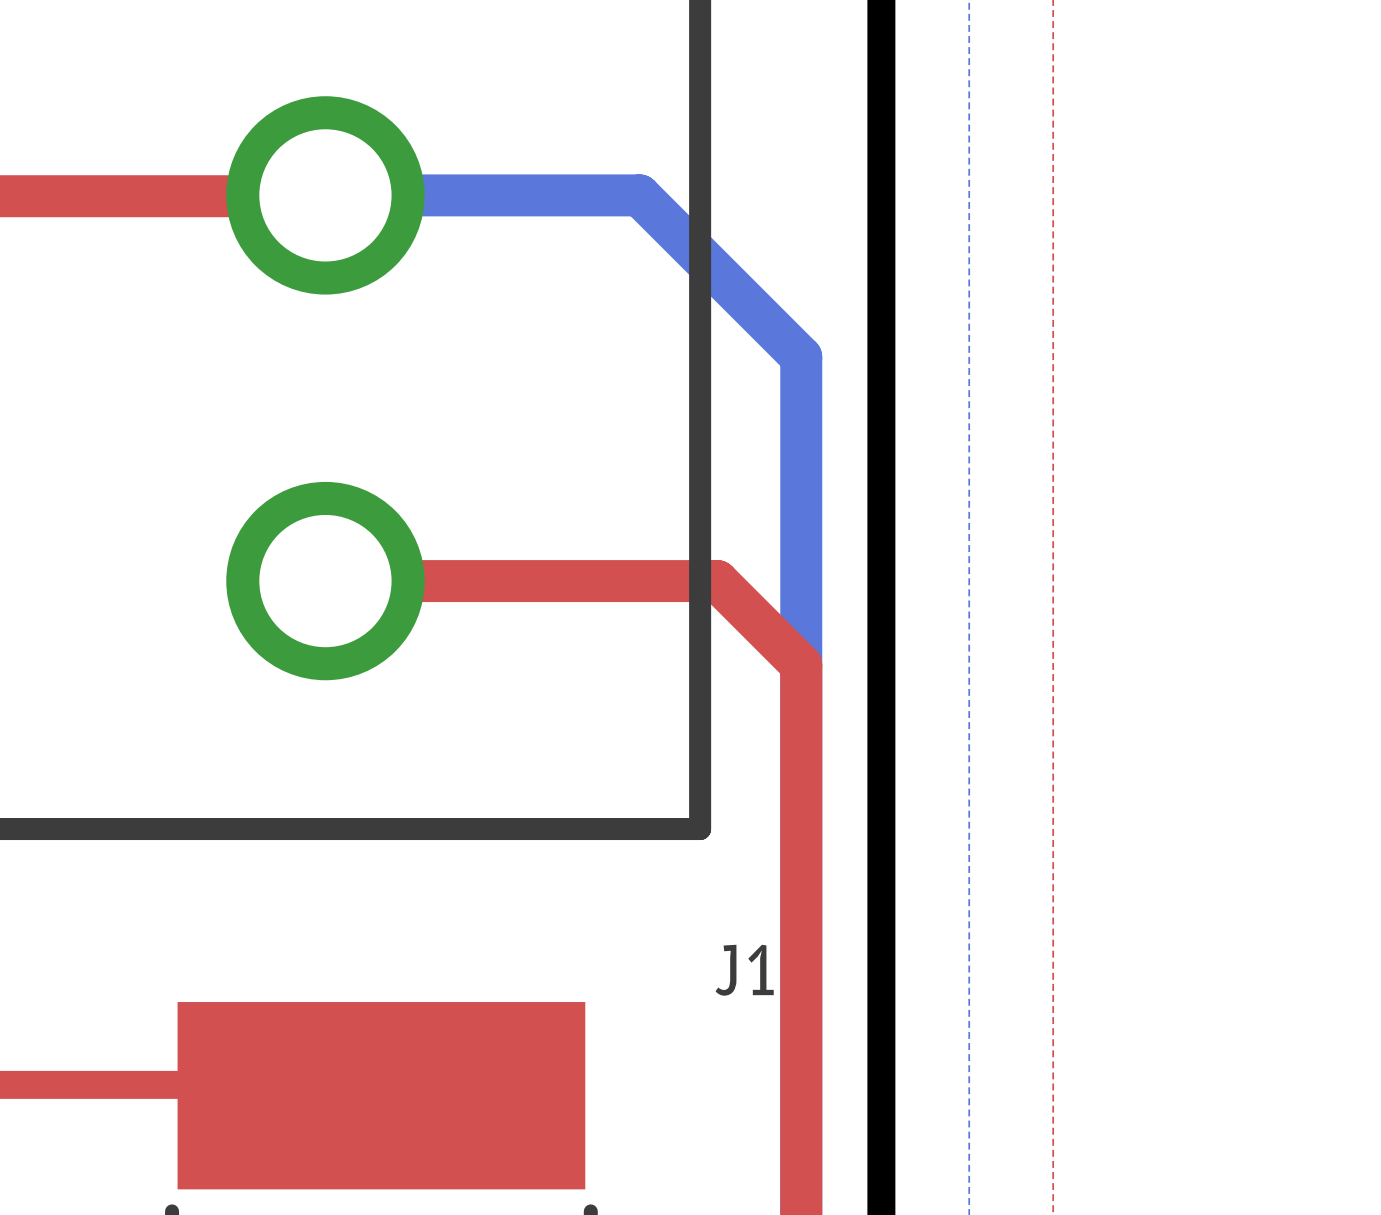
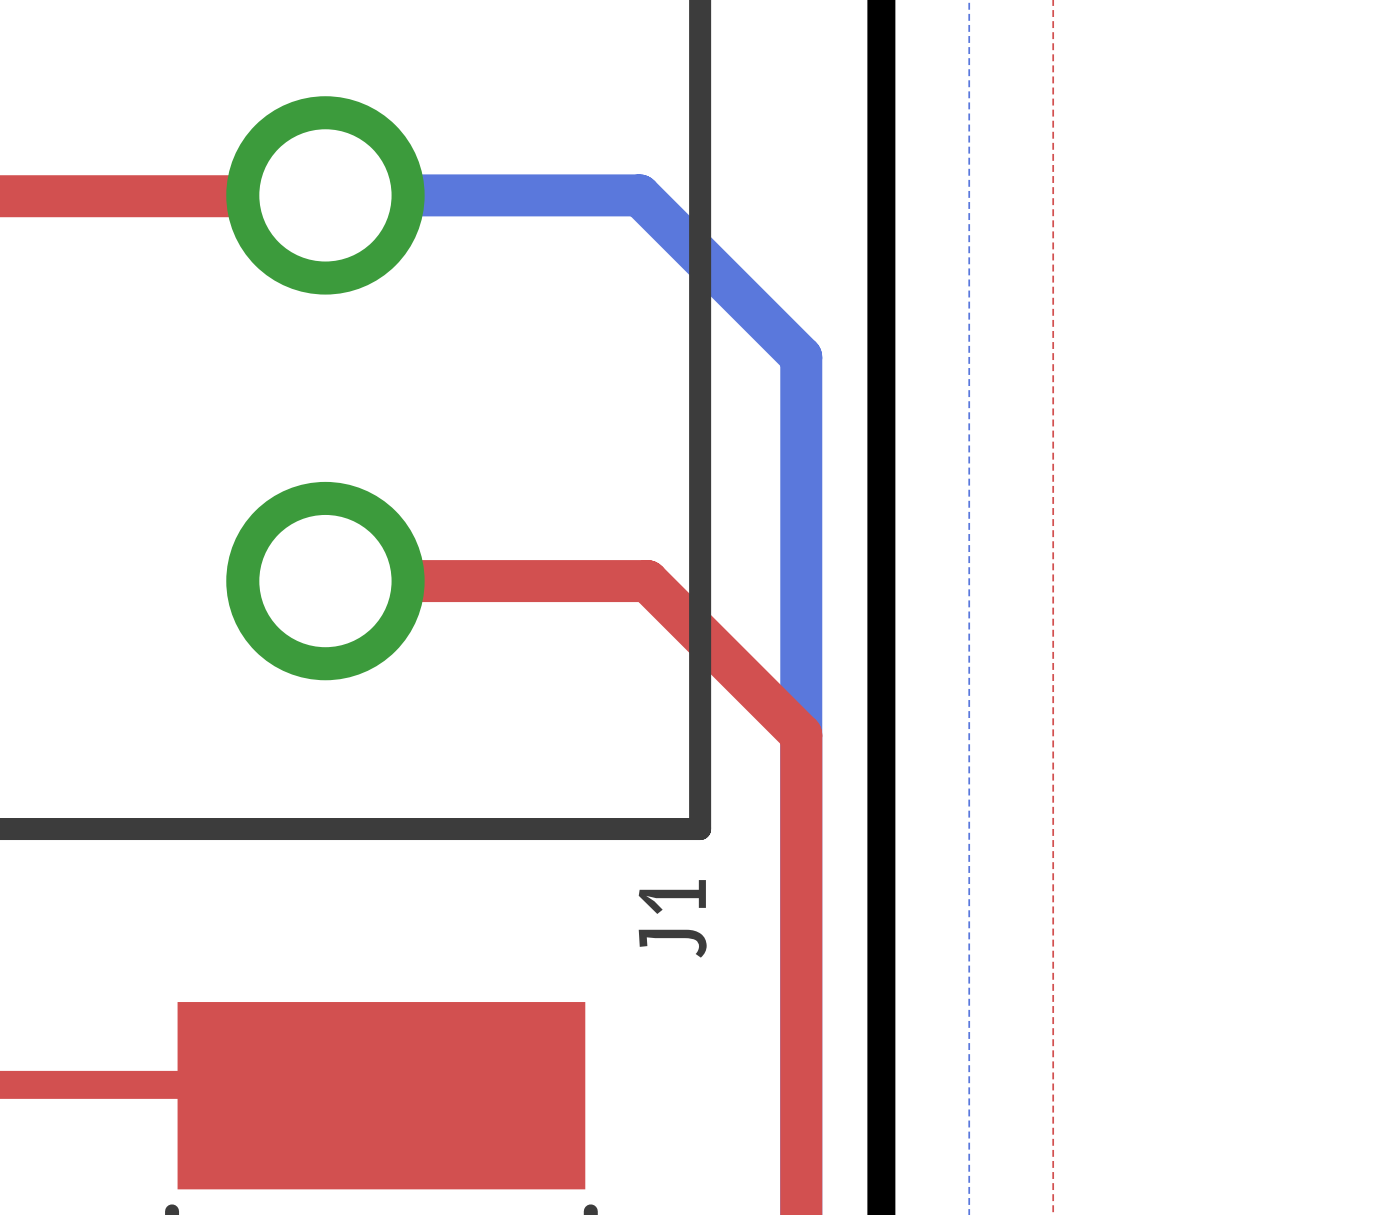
top track: (647, 581) (717, 581) (801, 665) (801, 735) -> (647, 581) (801, 735)
J1 name rotation: 0° (744, 970) -> 90° counterclockwise (672, 918)

